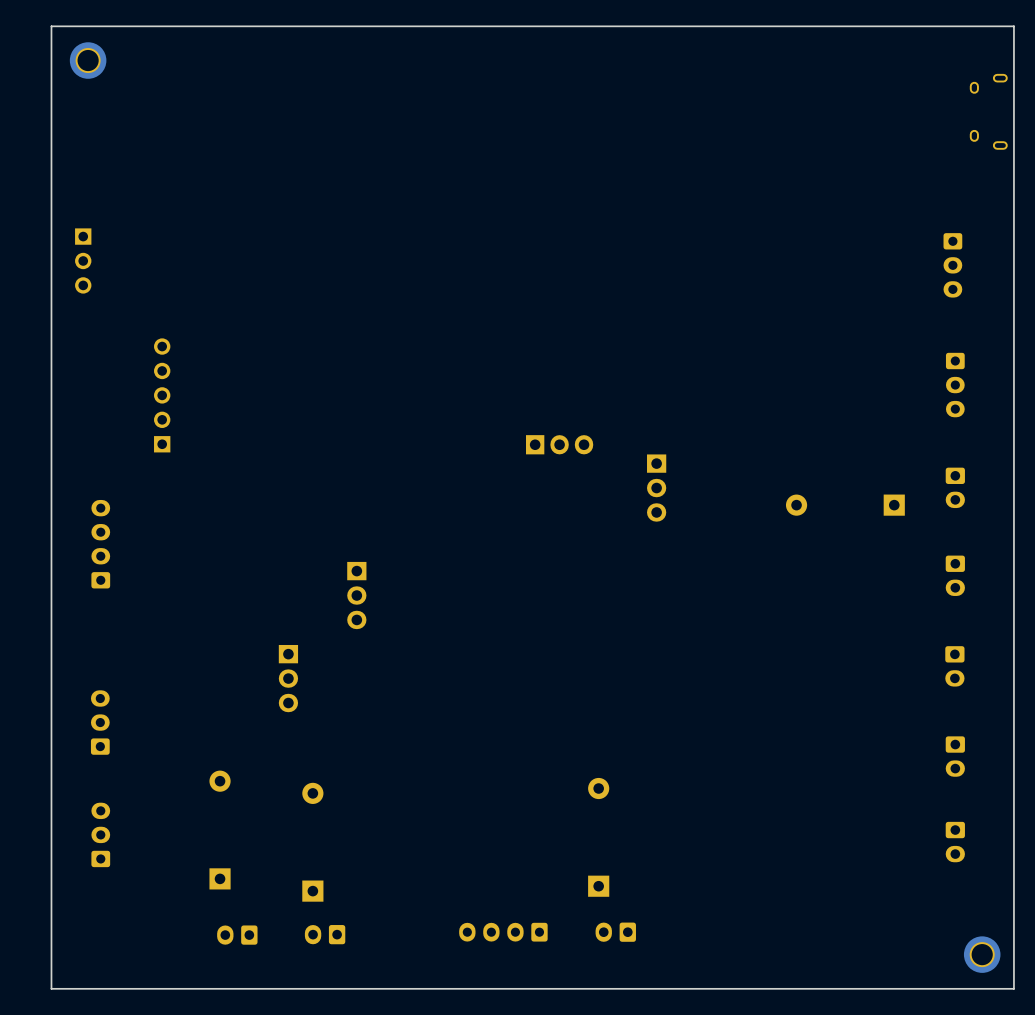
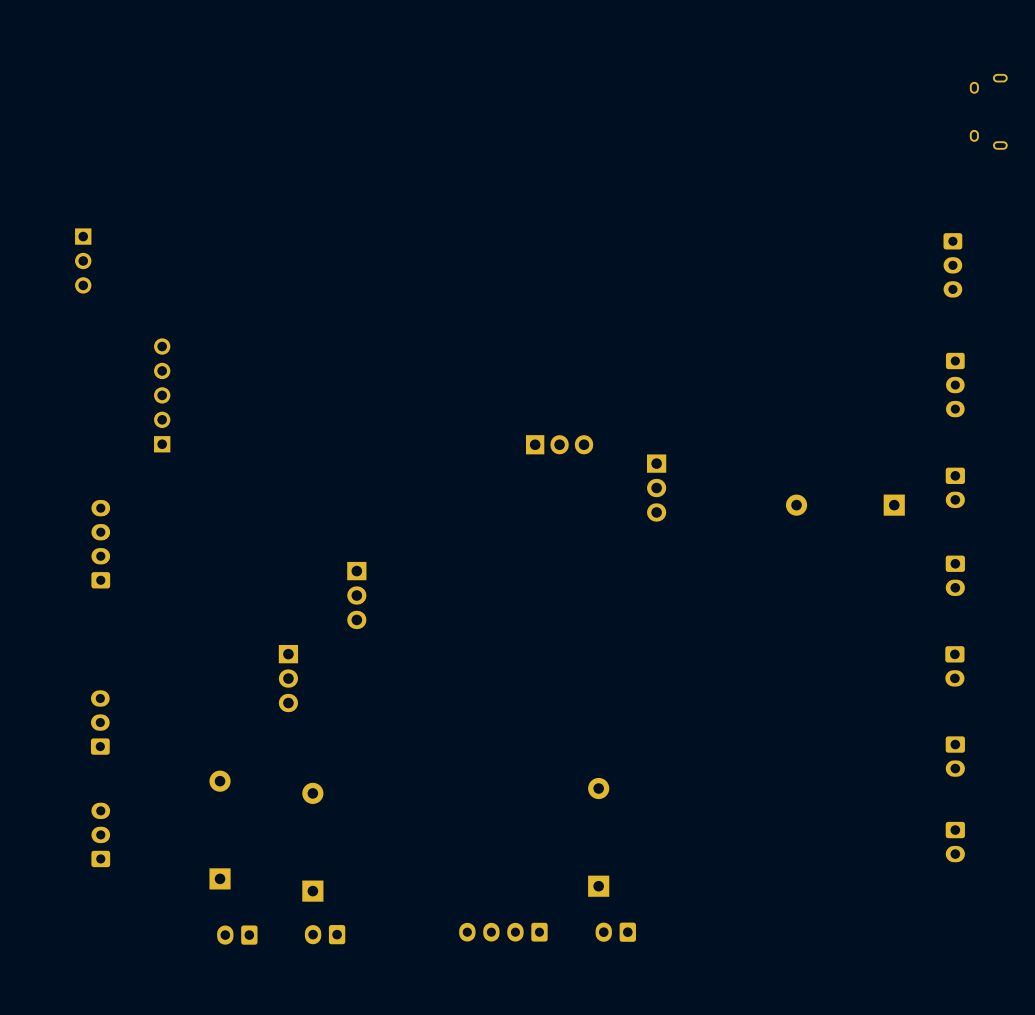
board edge: (1013, 26) (51, 26) (51, 988) (1013, 988) (1013, 26) -> none
part: (88, 60) -> none
part: (982, 954) -> none

